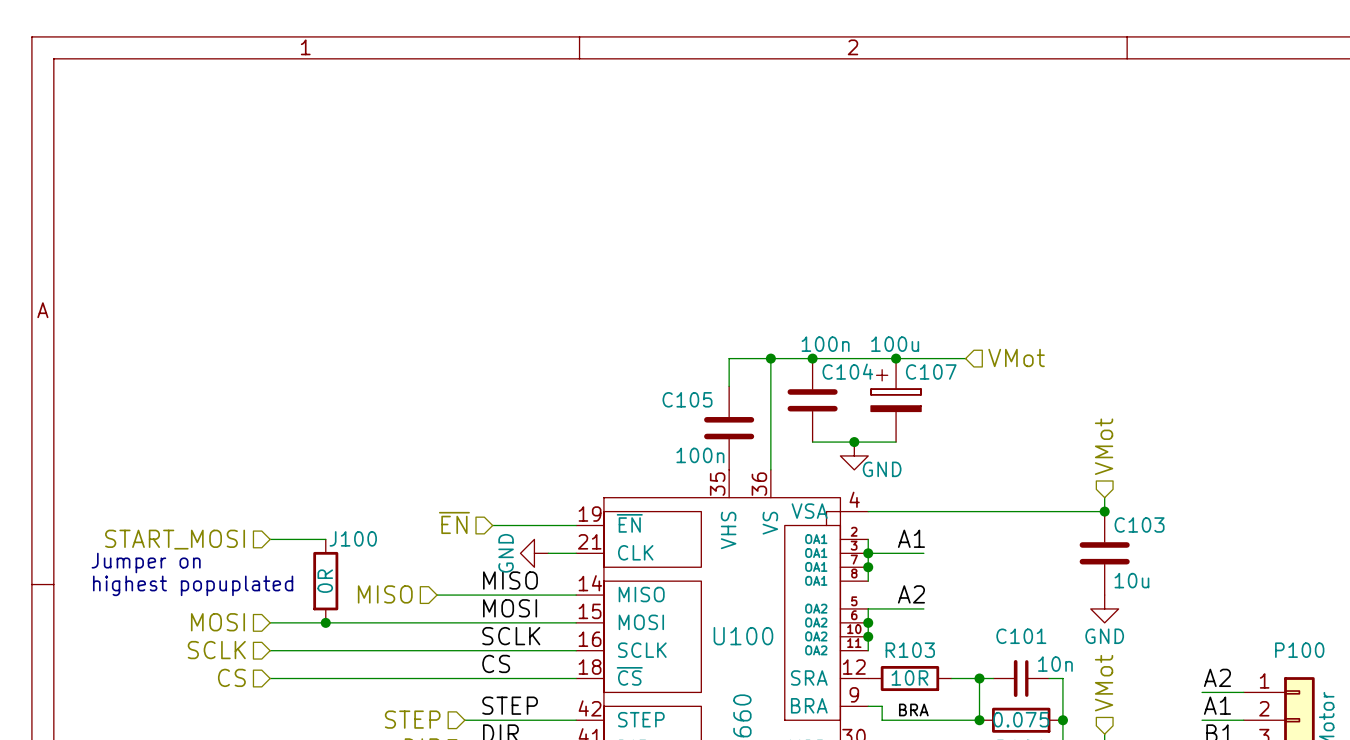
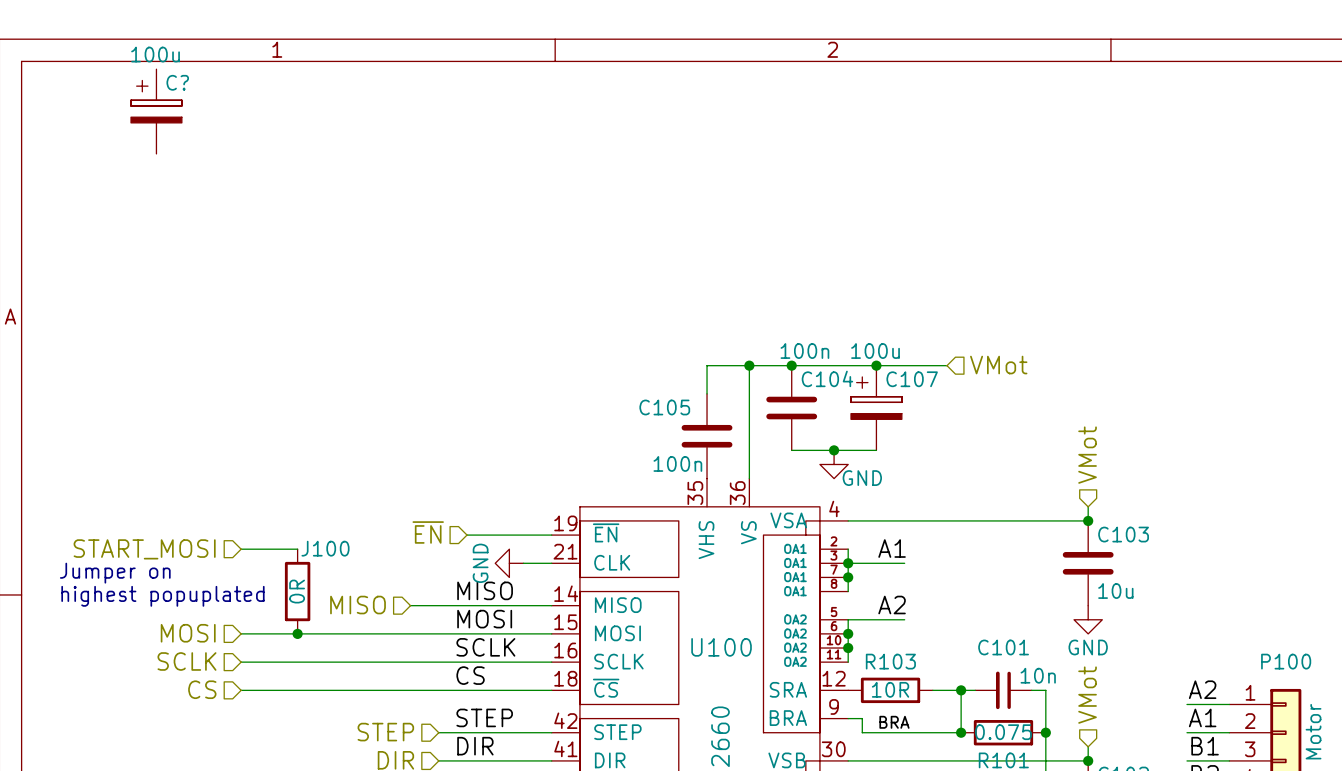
C?: none -> 100u (156, 111)

